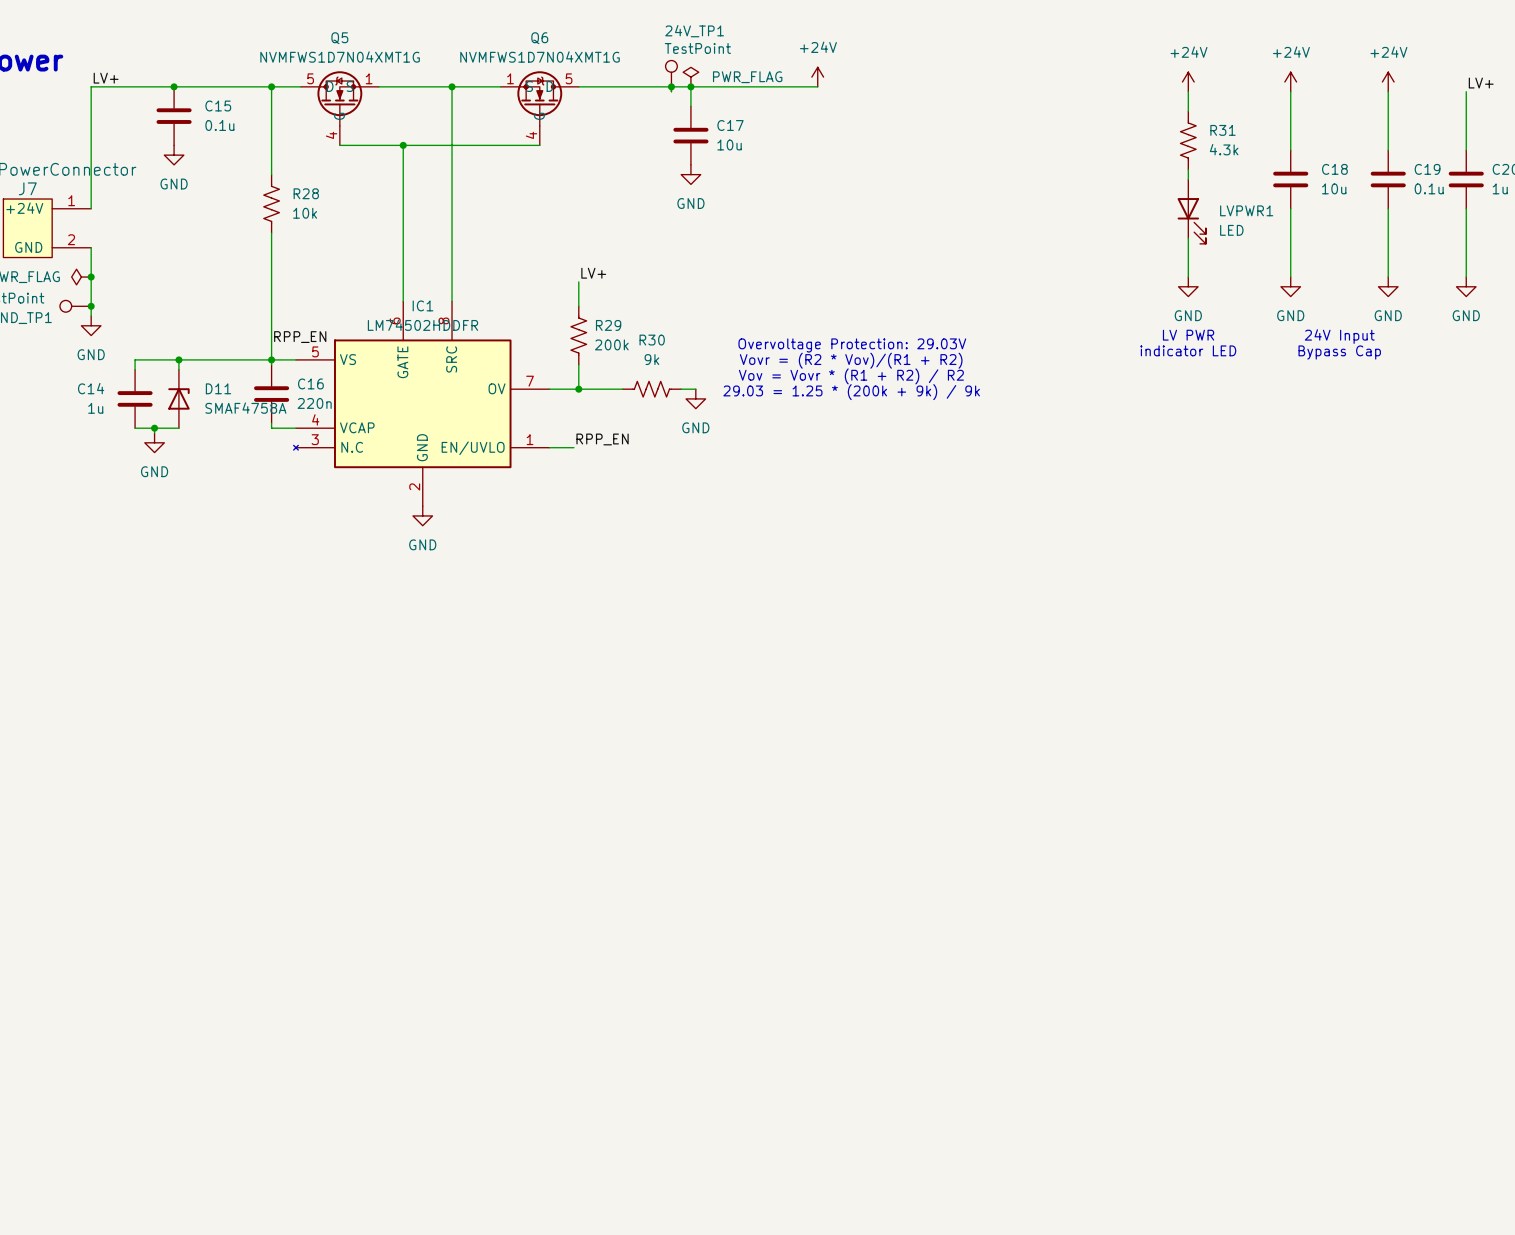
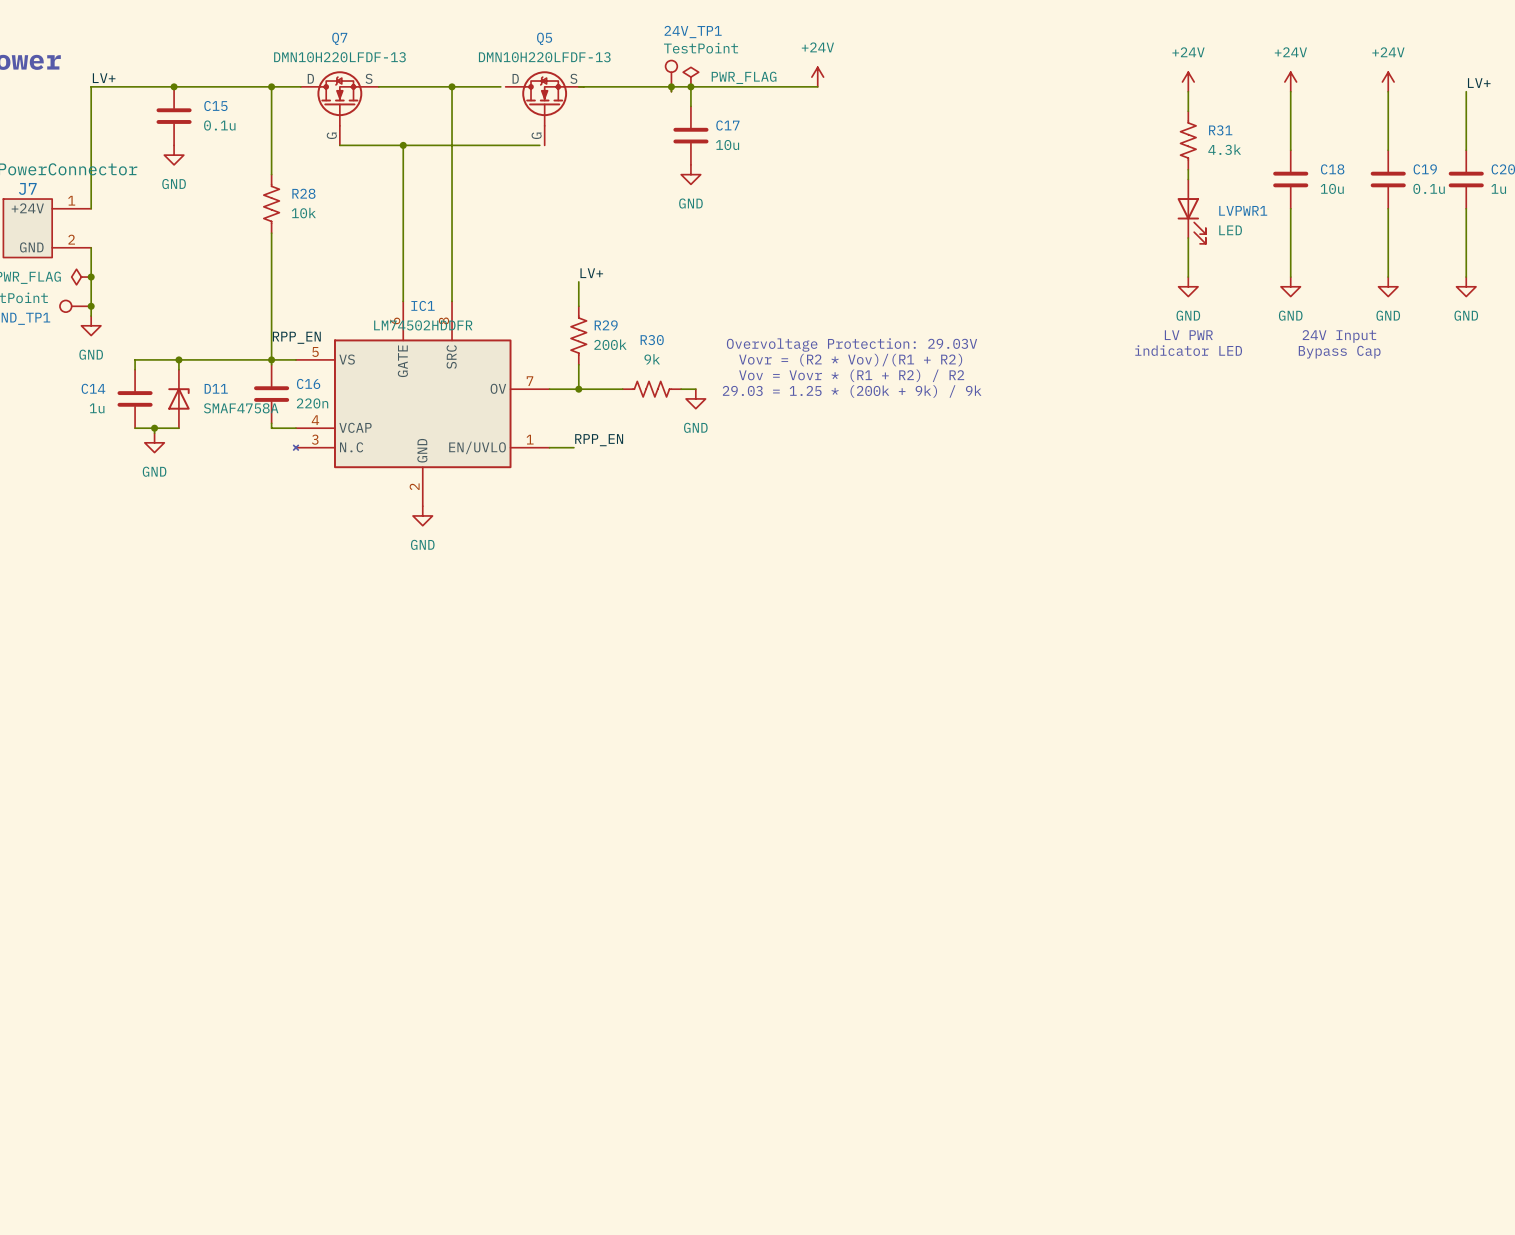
Q5 value: NVMFWS1D7N04XMT1G (340, 57) -> DMN10H220LFDF-13 (544, 57)
Q5 pin number: 5 (310, 78) -> none
Q5 pin number: 1 (369, 78) -> none
Q5 position: (339, 108) -> (544, 108)
Q7: none -> DMN10H220LFDF-13 (339, 108)
Q6: NVMFWS1D7N04XMT1G (539, 108) -> none
Q5 pin number: 4 (331, 135) -> none

